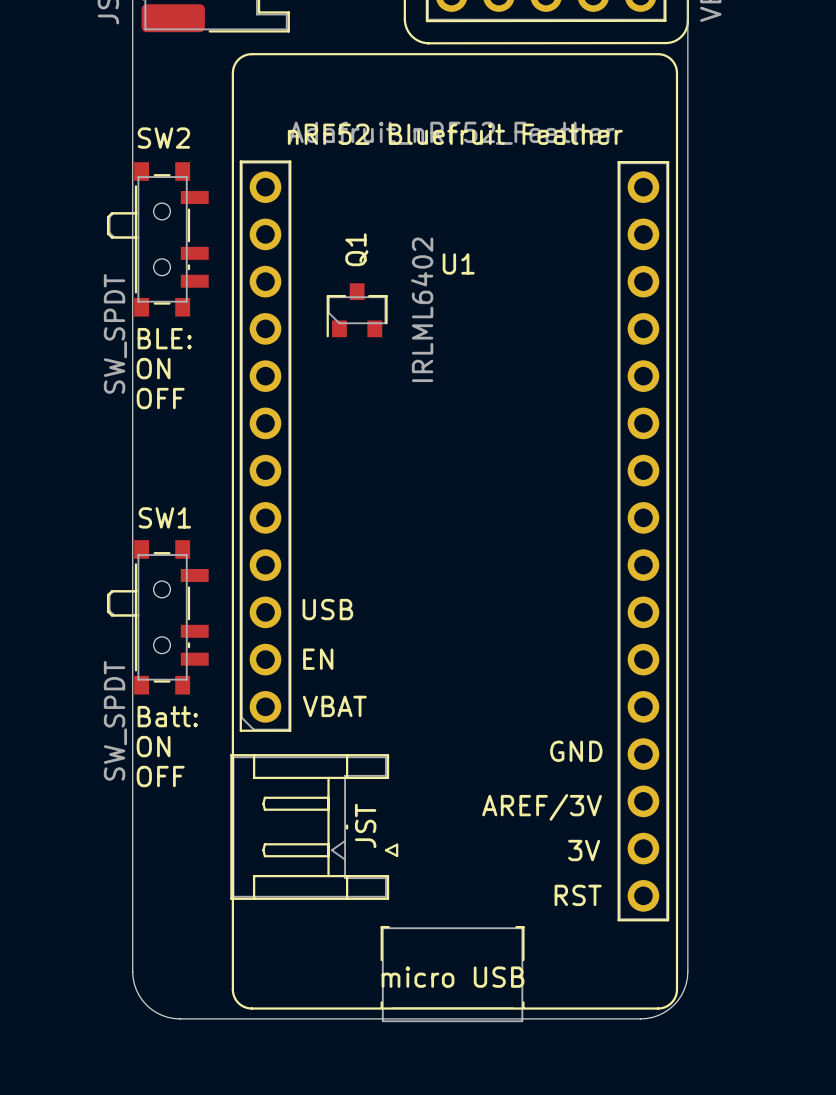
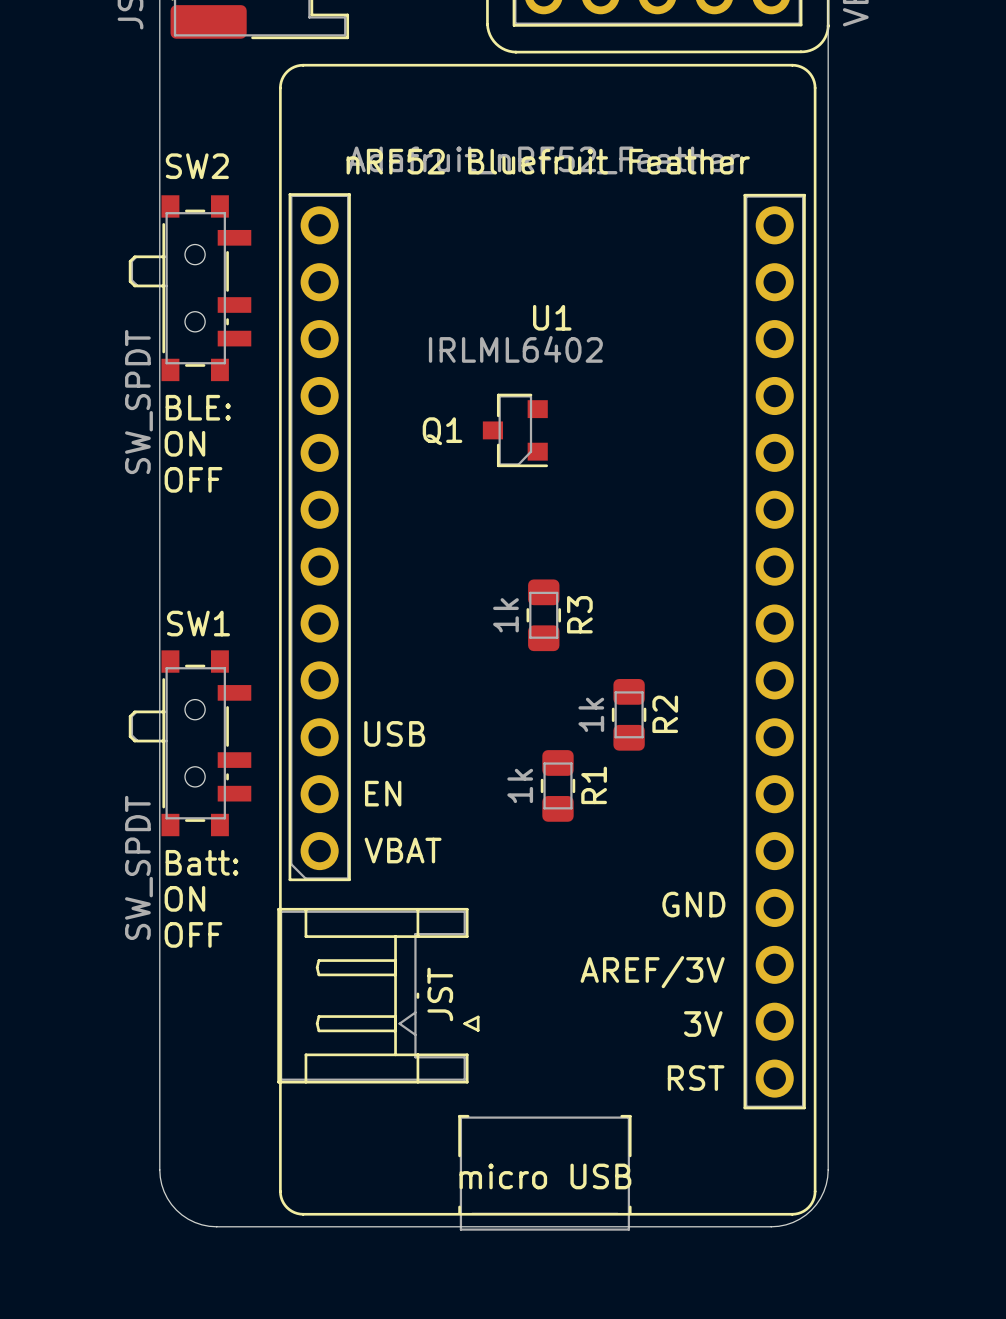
Q1 rotation: 0° (357, 310) -> 90° counterclockwise (515, 430)
Q1 position: (357, 310) -> (515, 430)
R3: none -> 1k (543, 615)
R2: none -> 1k (629, 714)
R1: none -> 1k (557, 785)

